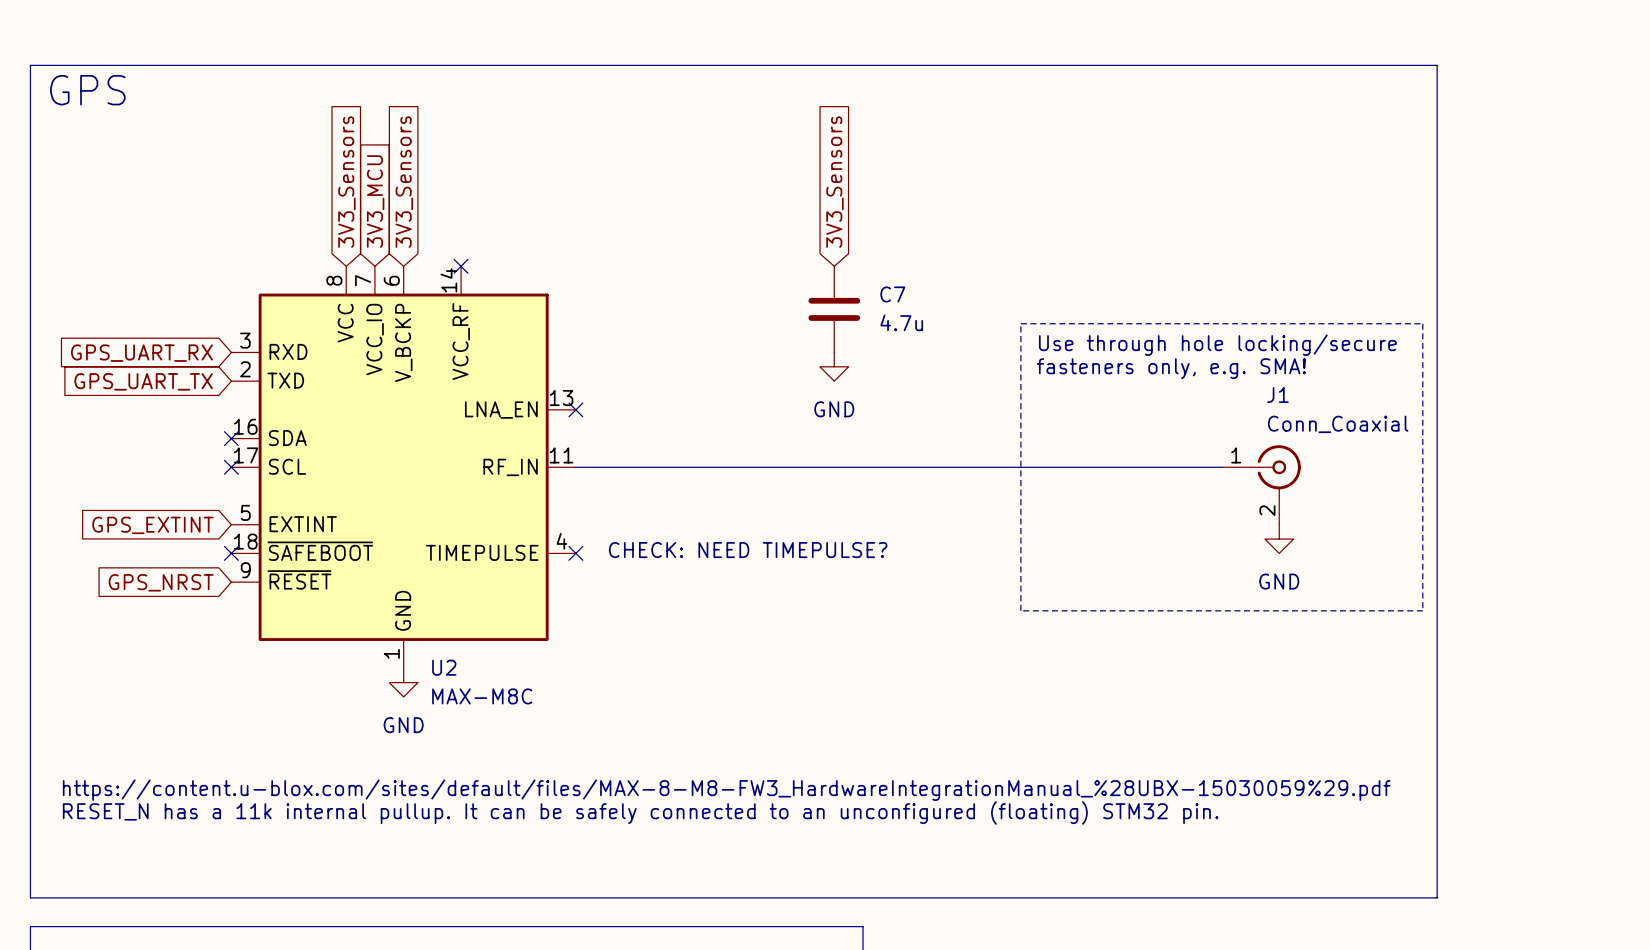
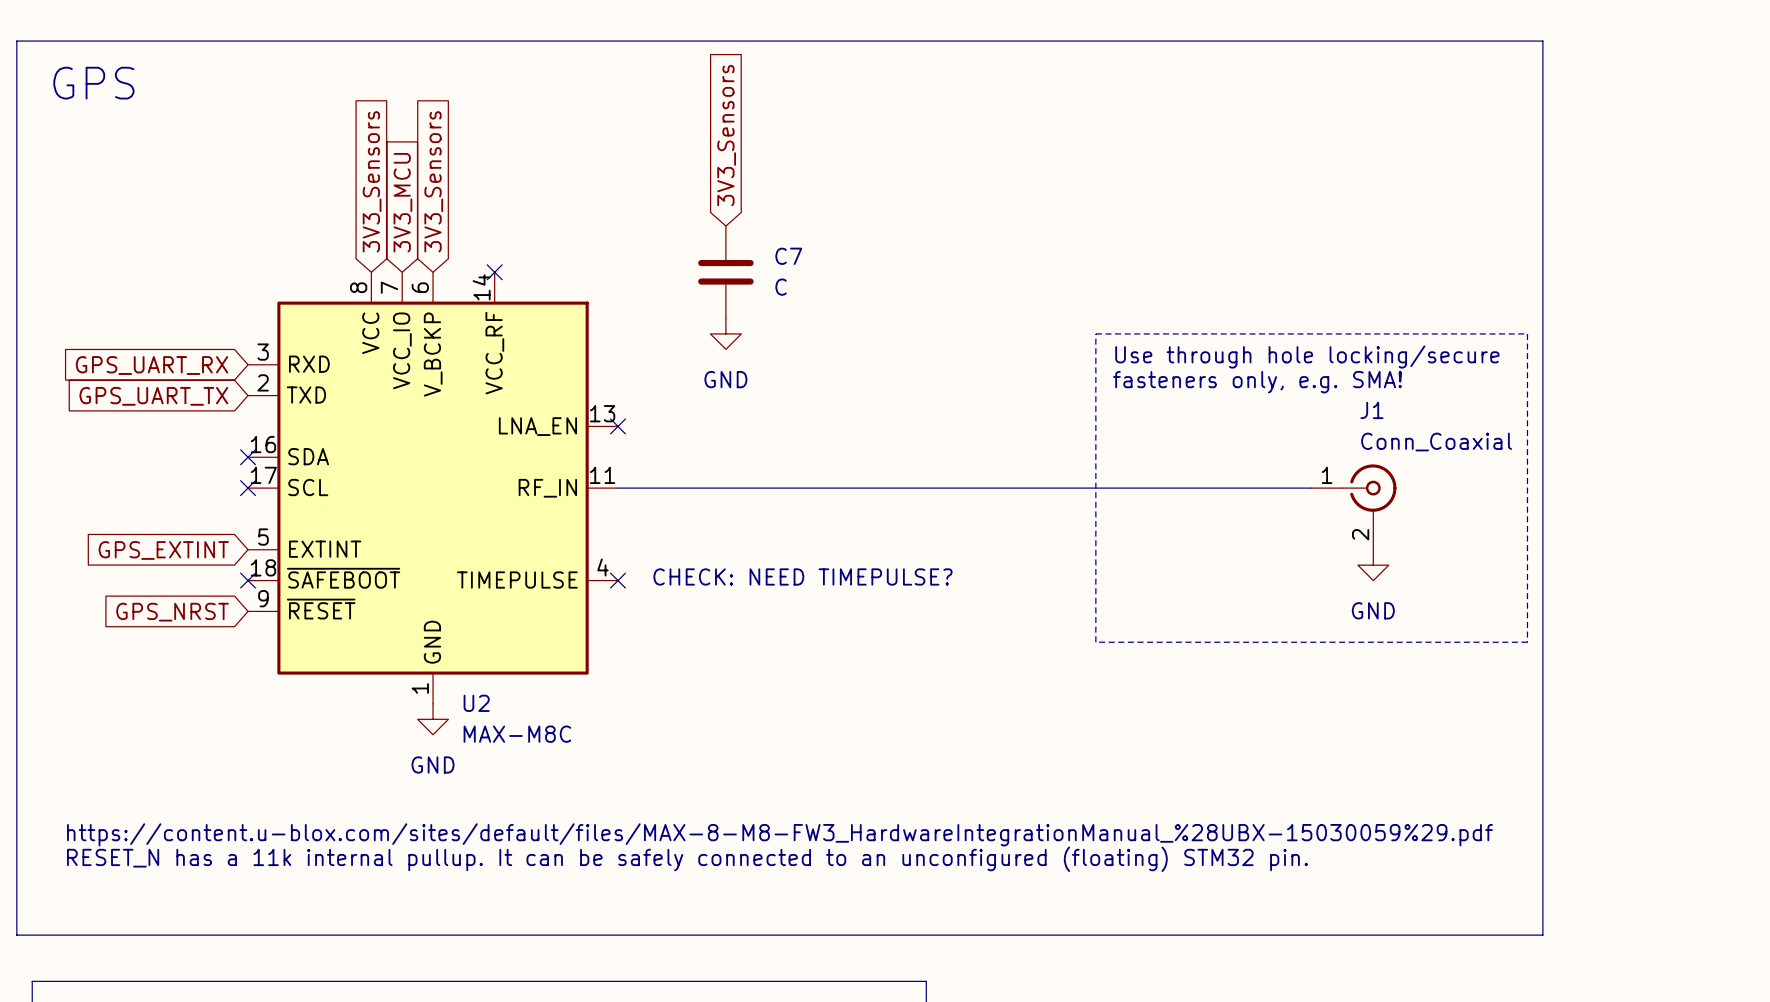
line: (1437, 65) (30, 65) (30, 897) (1437, 897) (1437, 883) -> (1542, 56) (1542, 41) (16, 41) (16, 935) (1542, 935)
global label position: 3V3_Sensors (834, 182) -> 3V3_Sensors (726, 135)
C7 position: (834, 309) -> (725, 272)
C7 value: 4.7u (901, 322) -> C (781, 287)
power symbol position: GND (834, 366) -> GND (725, 333)

